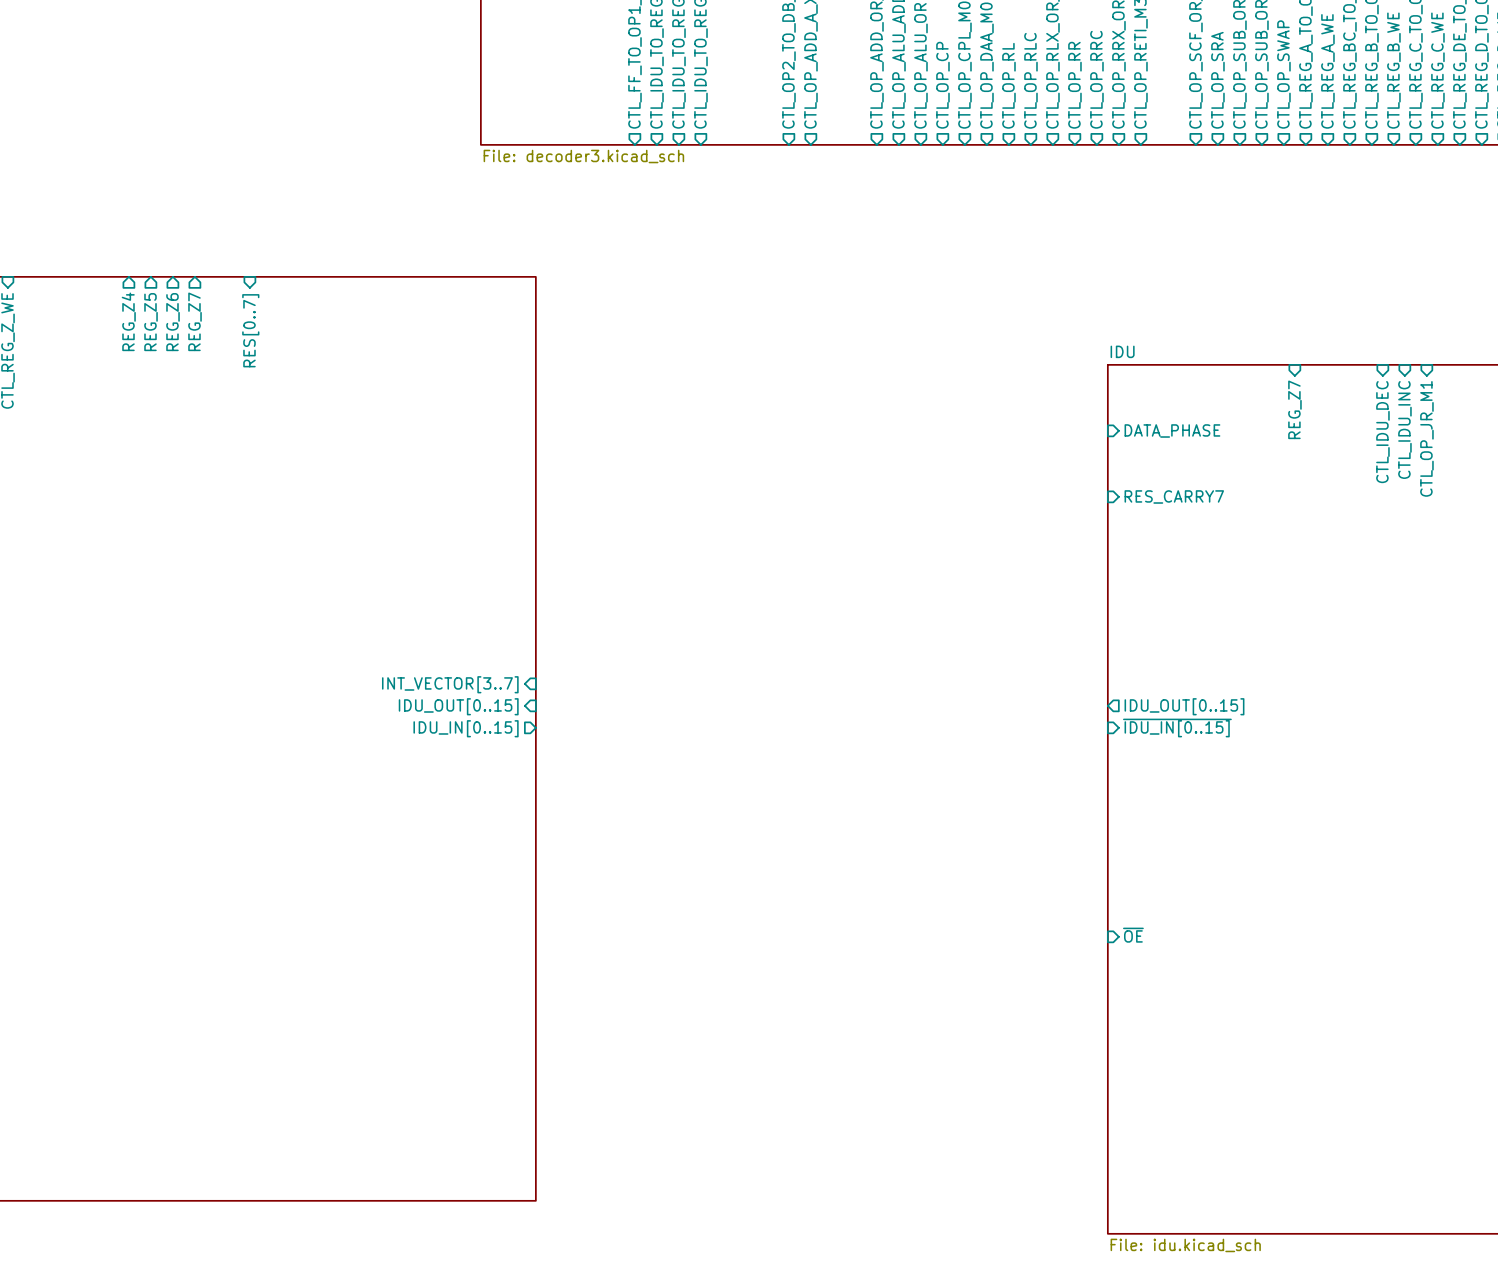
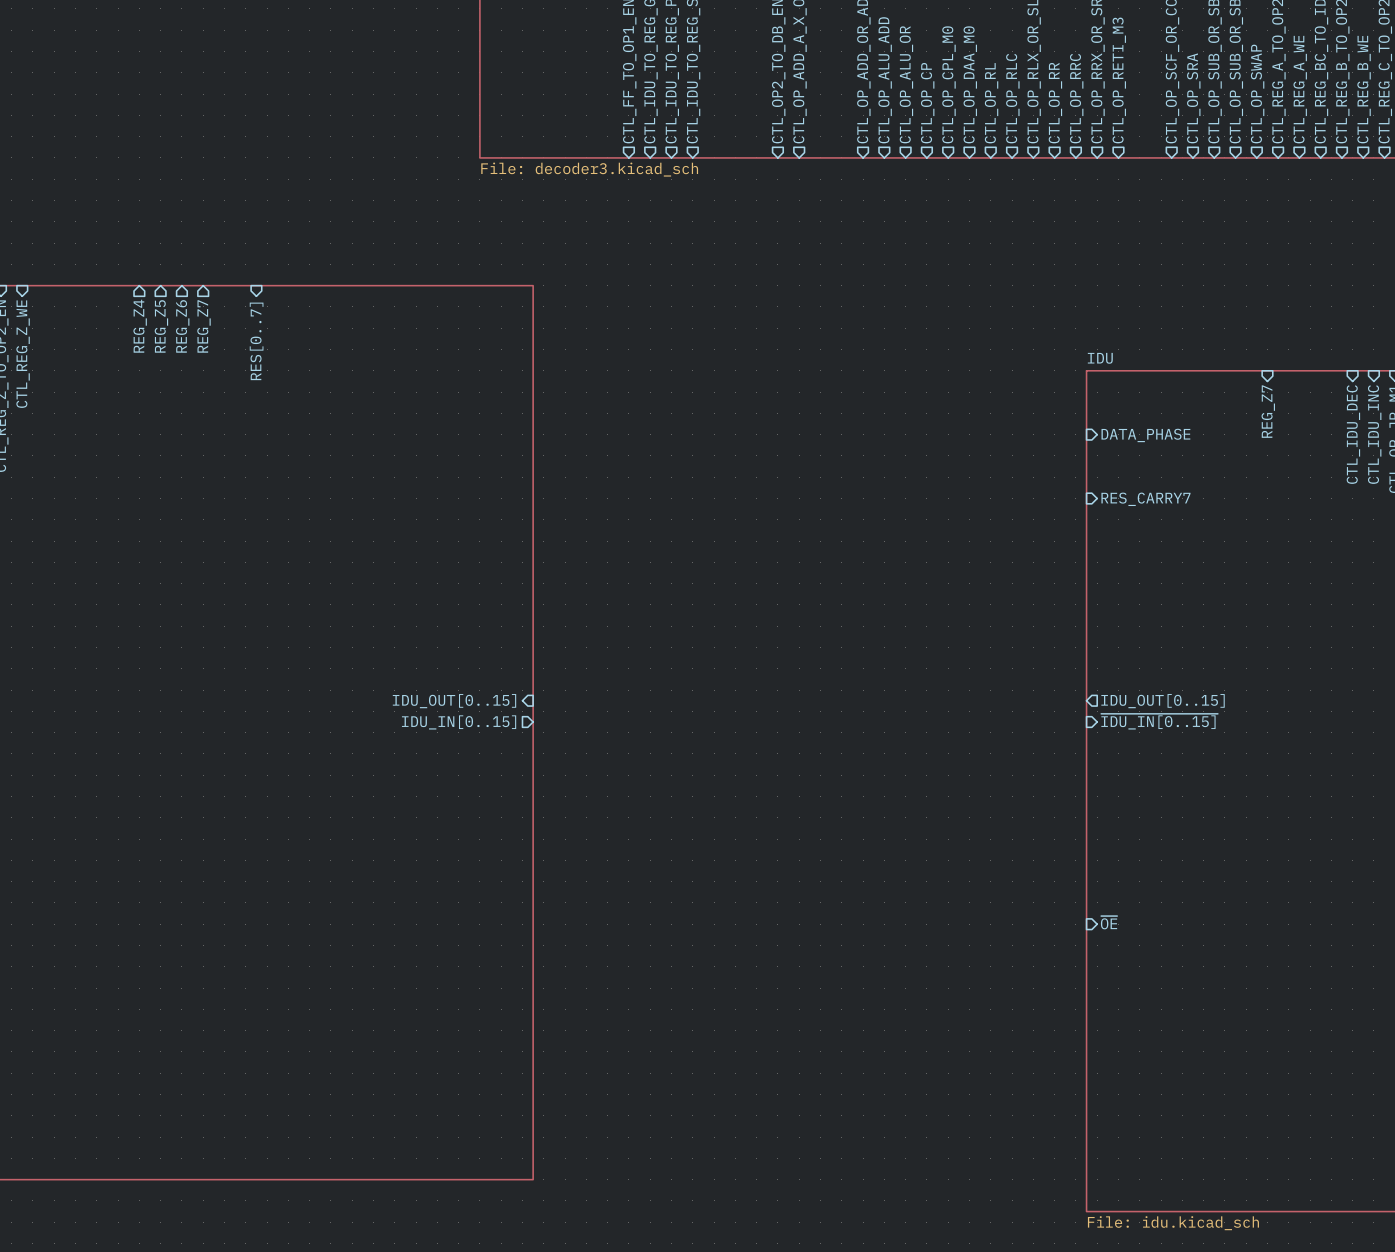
sheet pin: INT_VECTOR[3..7] (450, 684) -> none

